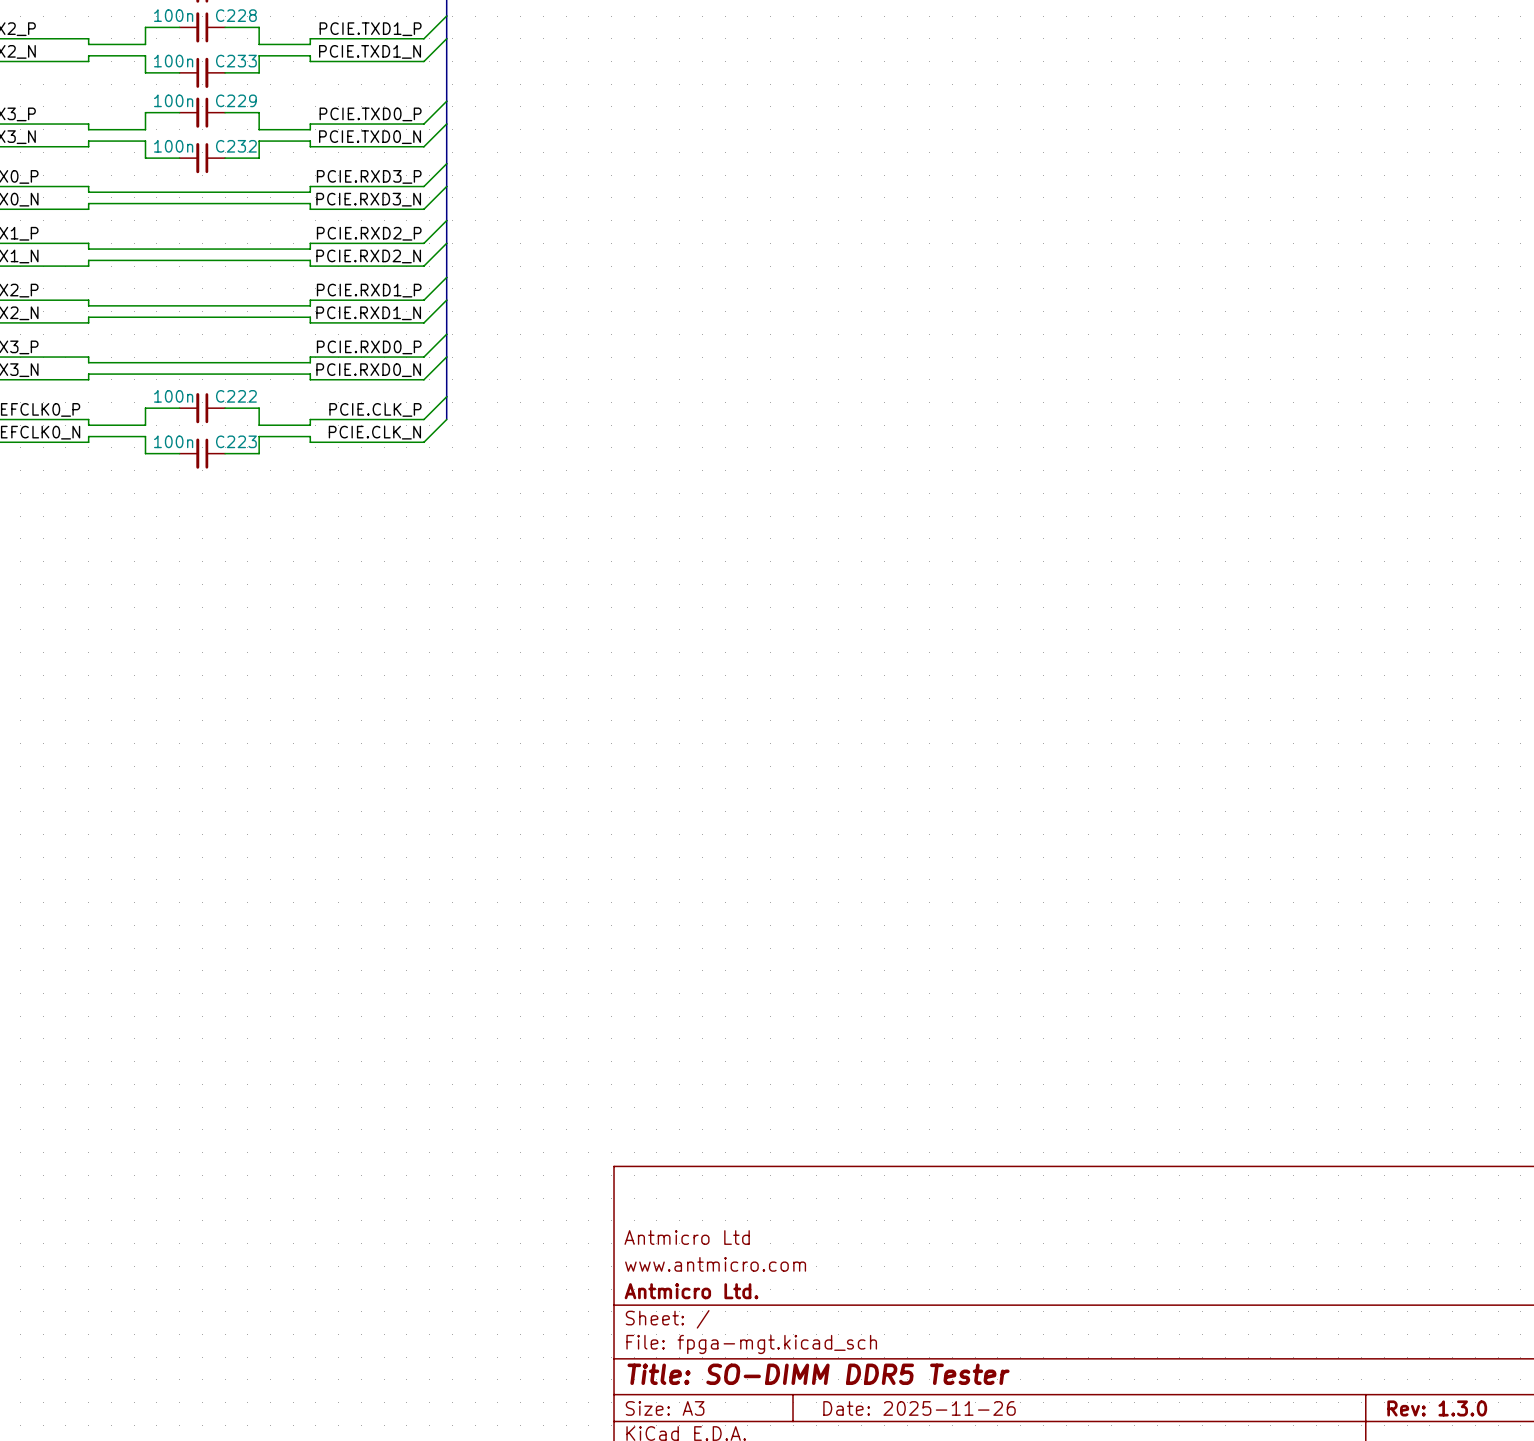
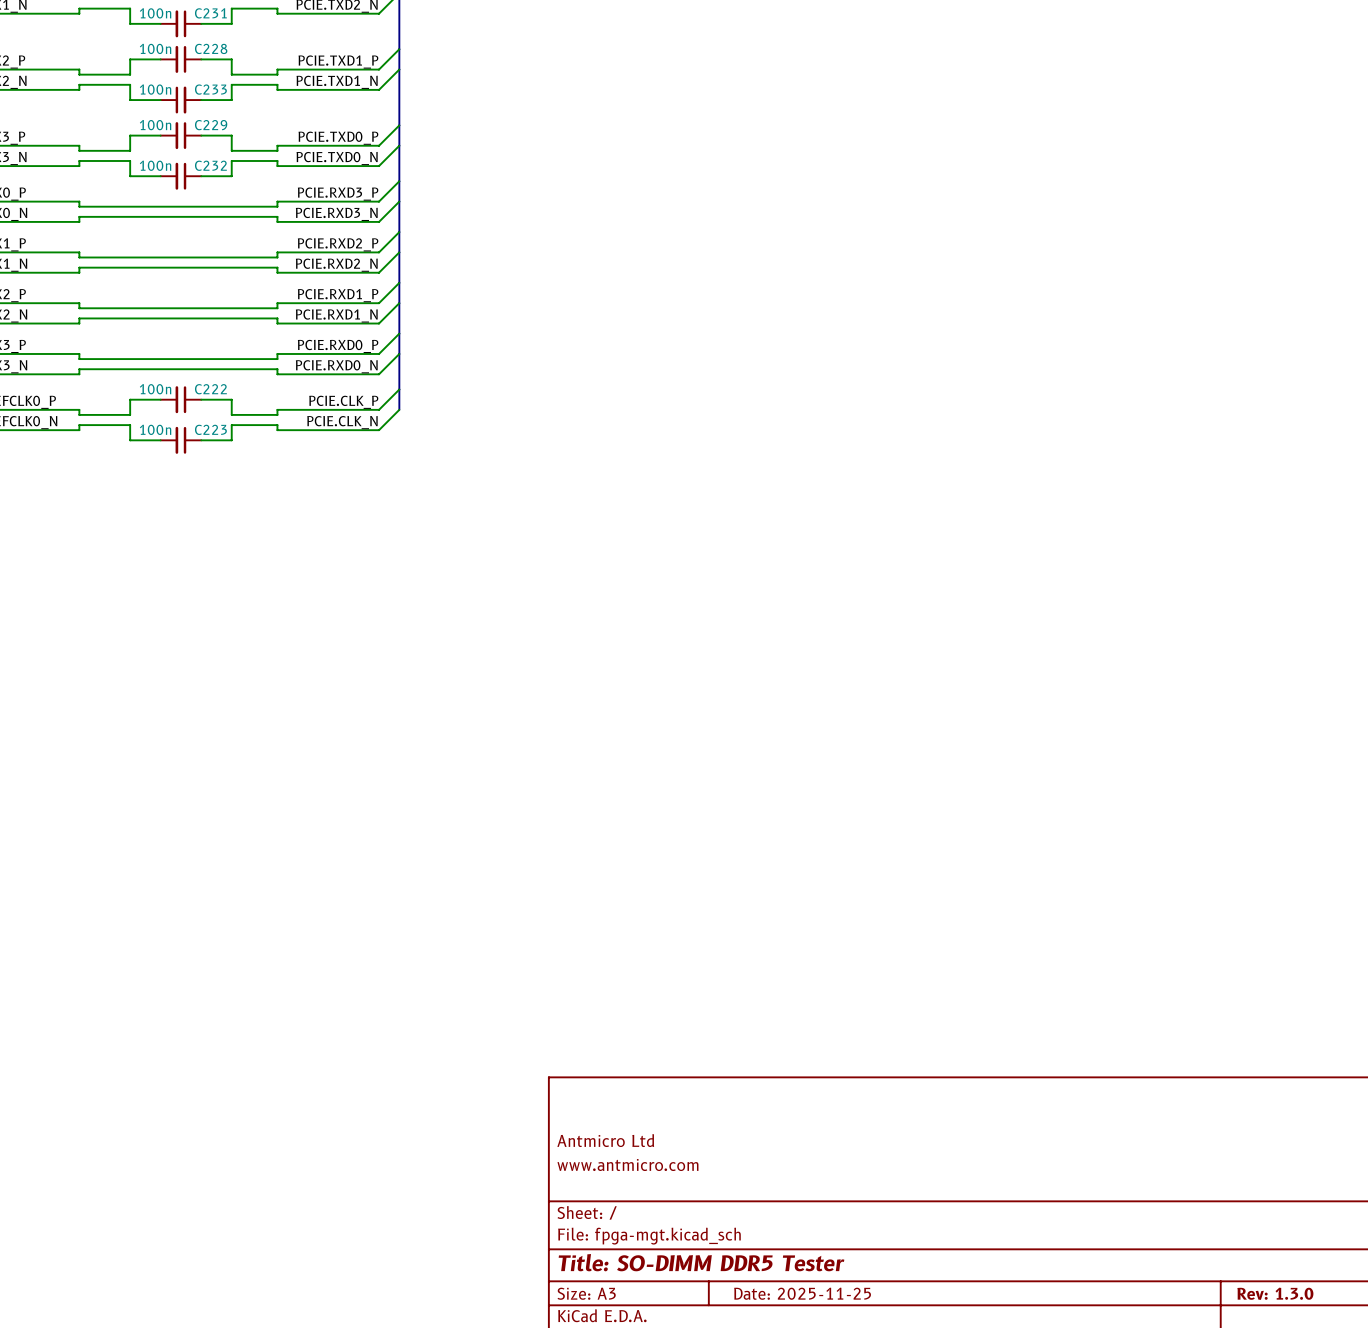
title block: Antmicro Ltd. (691, 1291) -> none
title block: Date: 2025-11-26 (919, 1408) -> Date: 2025-11-25 (802, 1293)

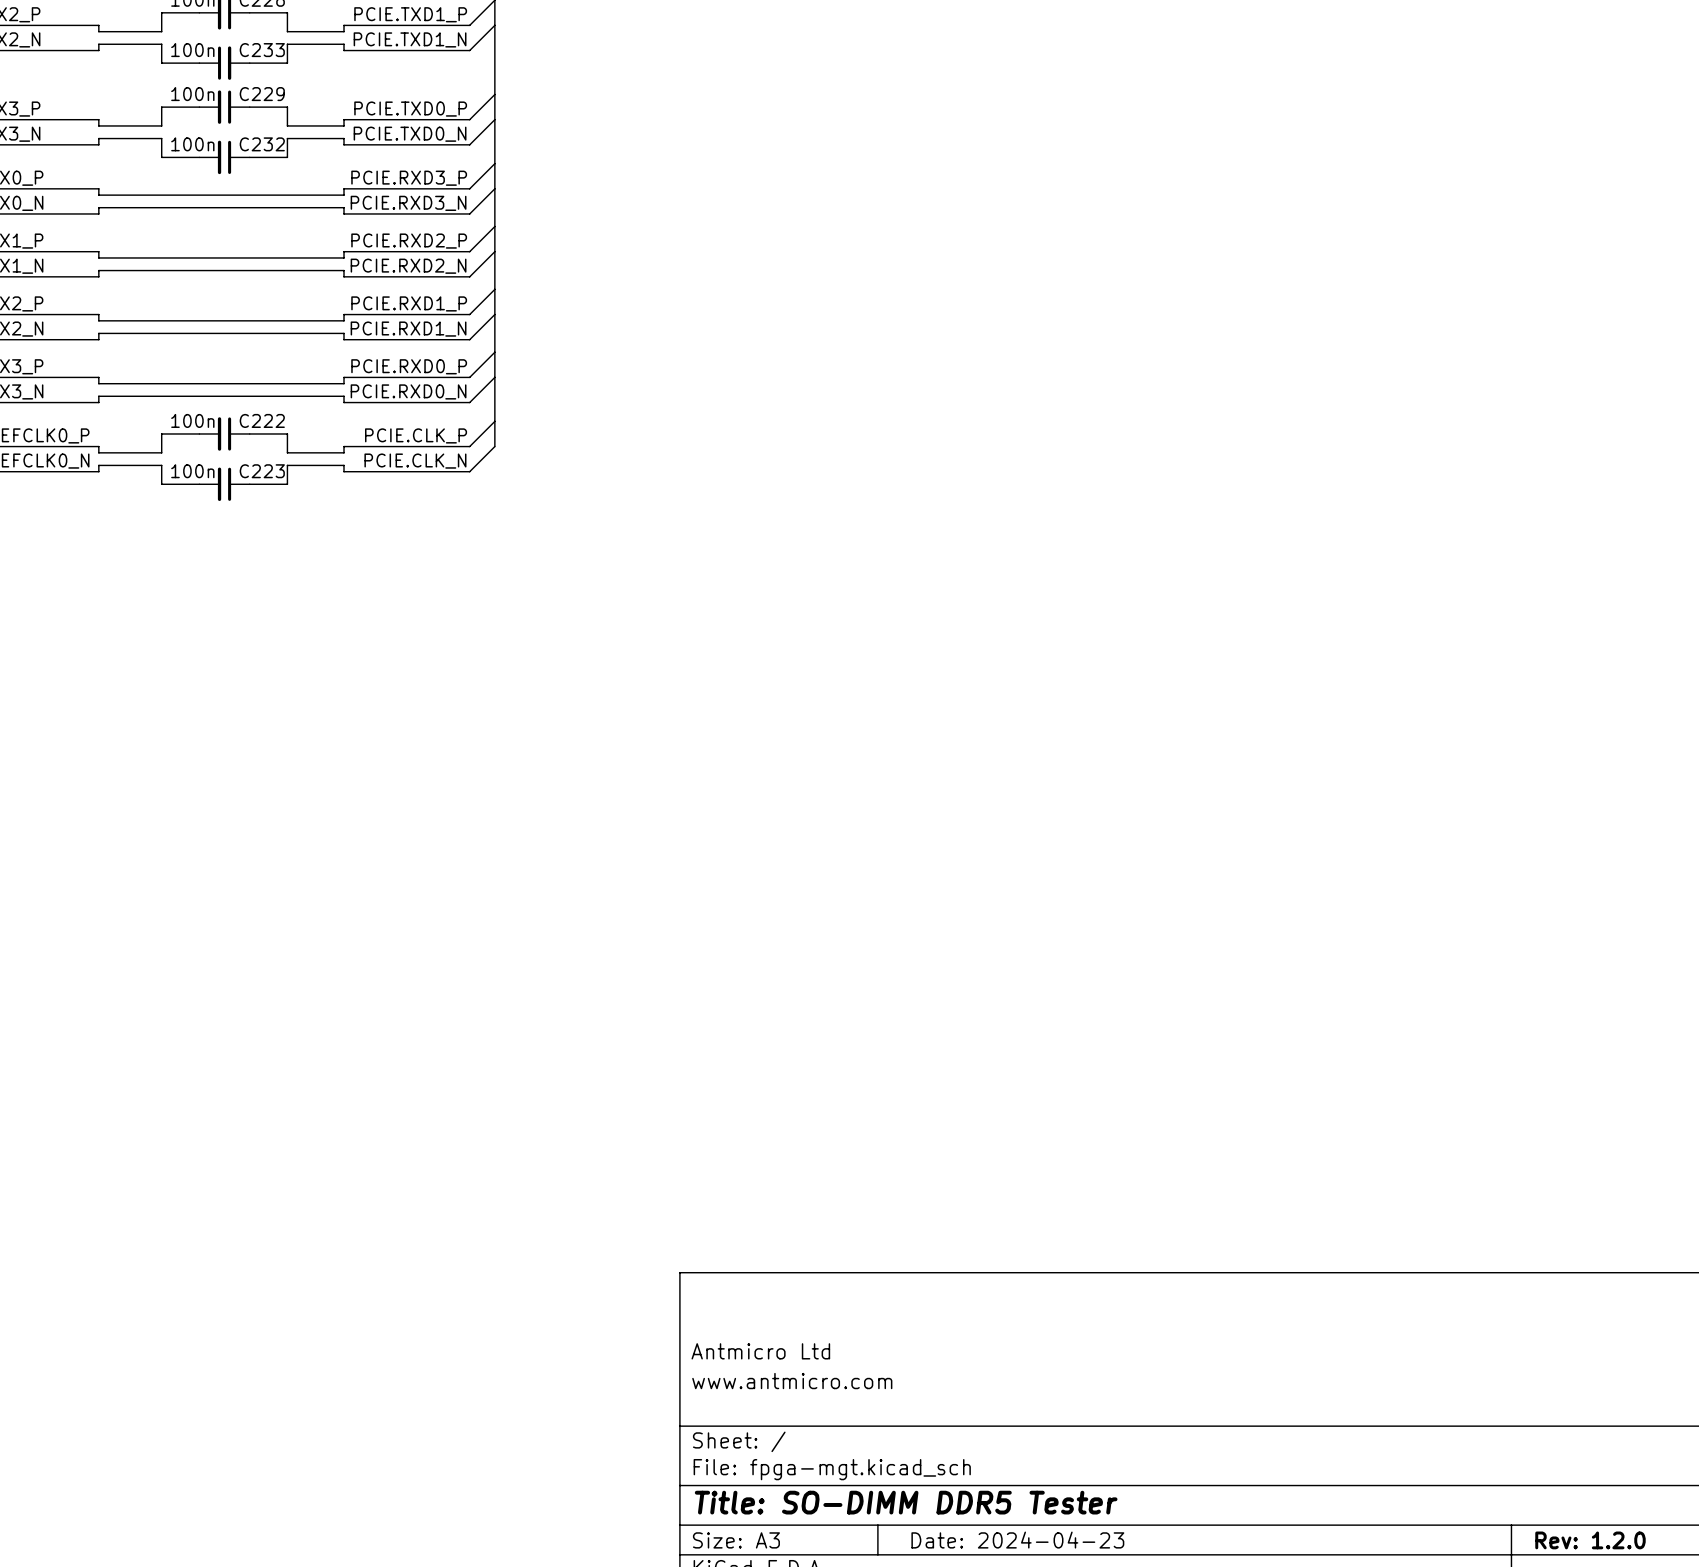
title block: Date: 2025-11-25 (802, 1293) -> Date: 2024-04-23 (1017, 1540)
title block: Rev: 1.3.0 (1275, 1293) -> Rev: 1.2.0 (1590, 1540)

